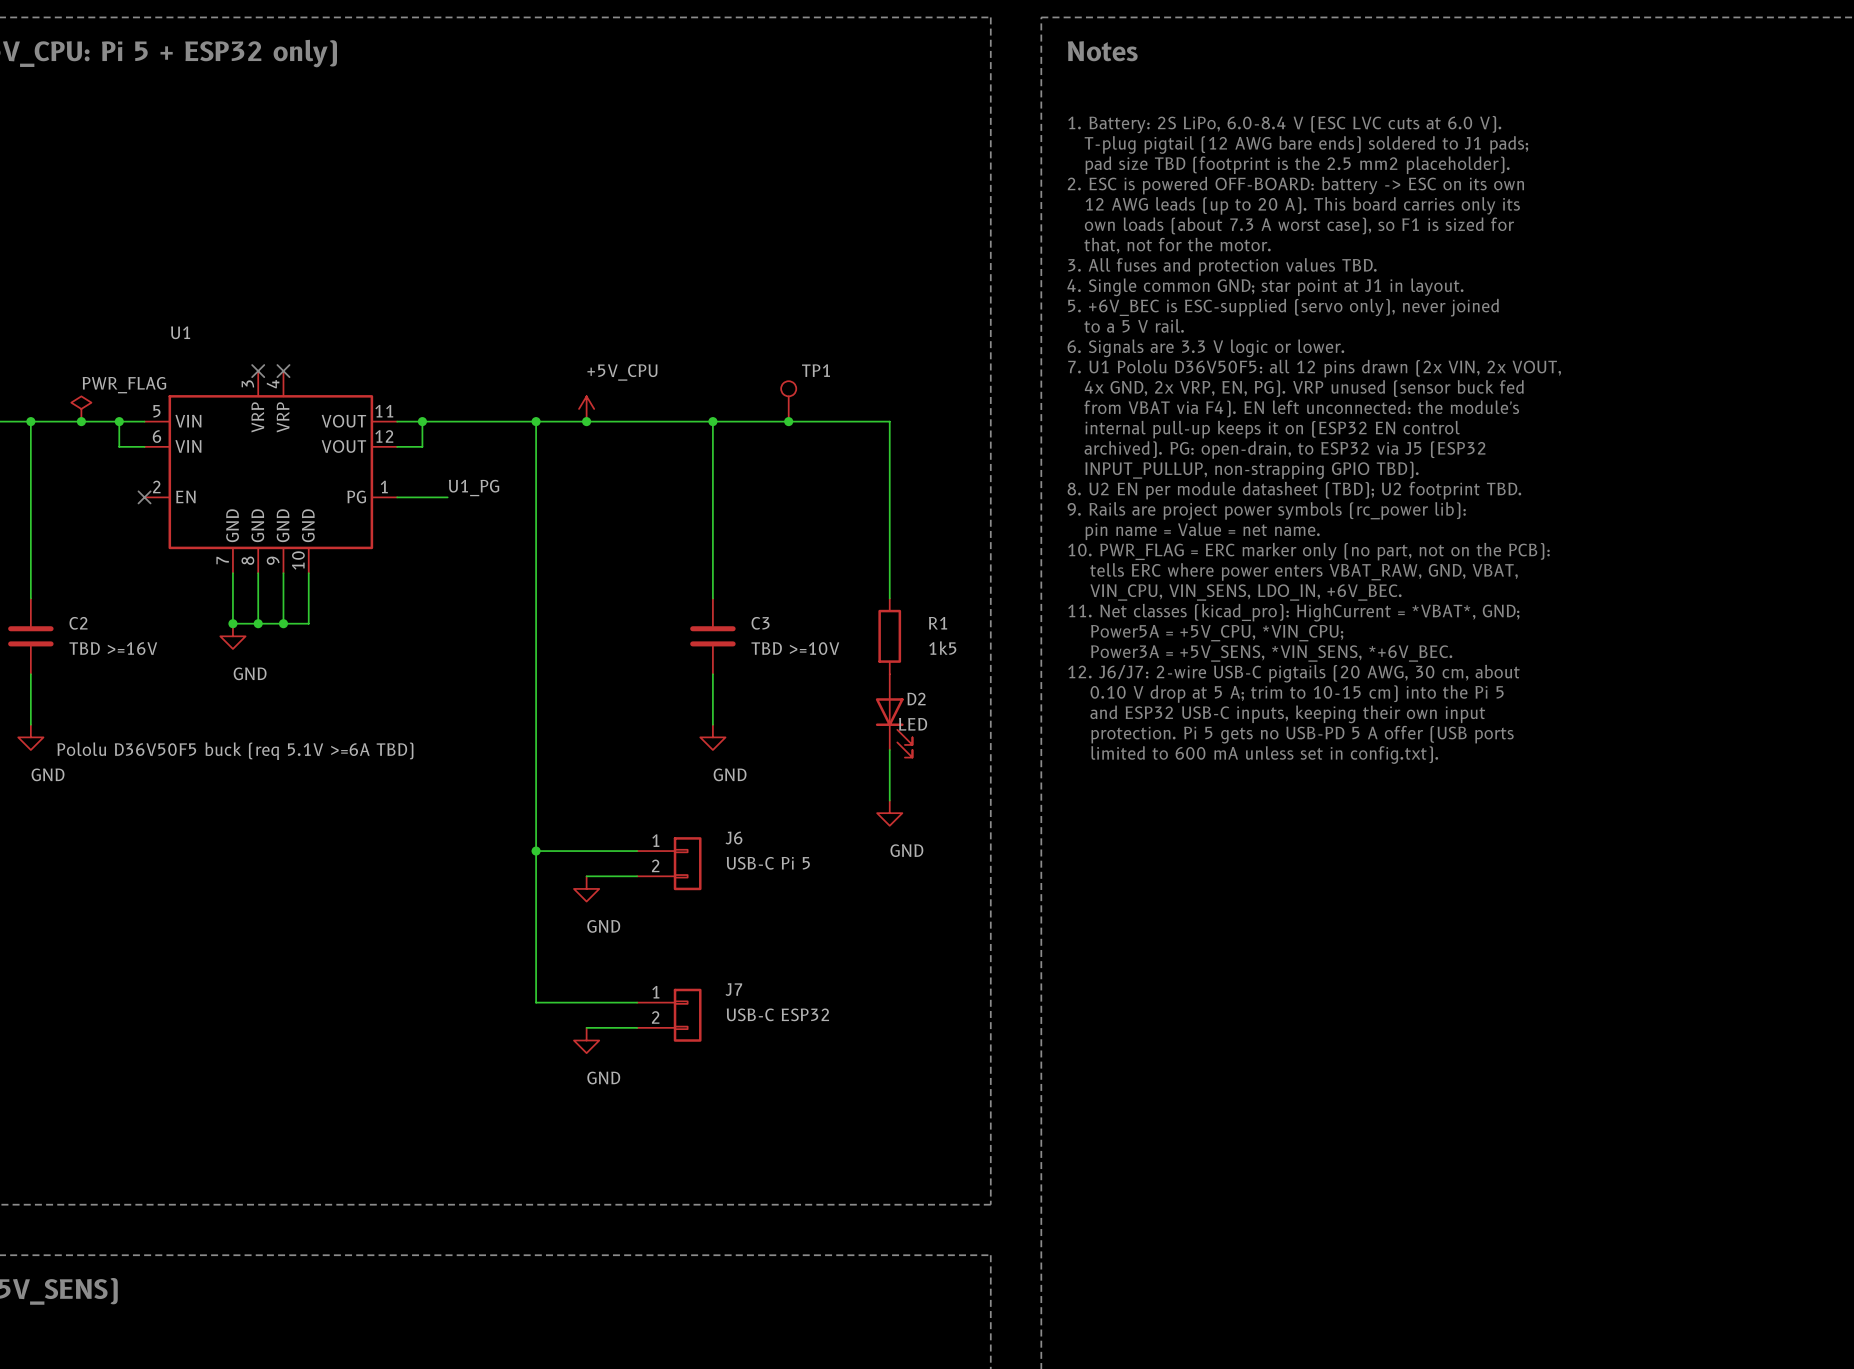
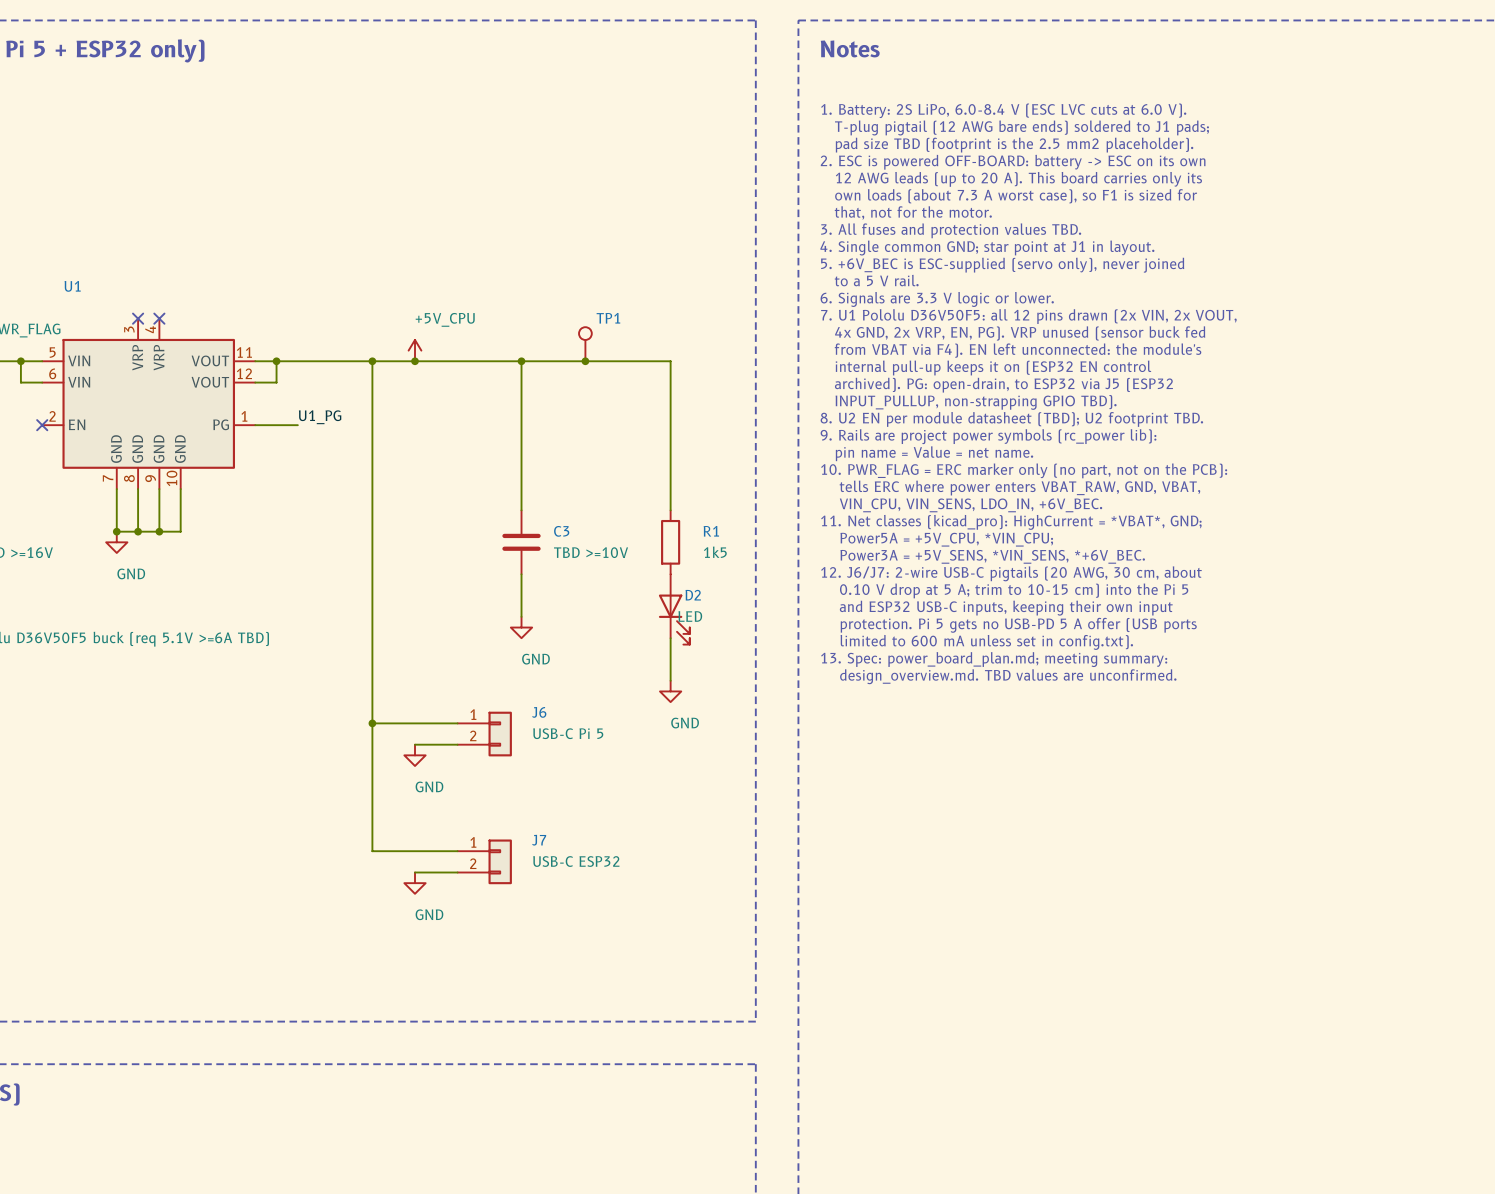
text: none -> 13. Spec: power_board_plan.md; meeting summary: (994, 659)
text: none -> design_overview.md. TBD values are unconfirmed. (1008, 676)

